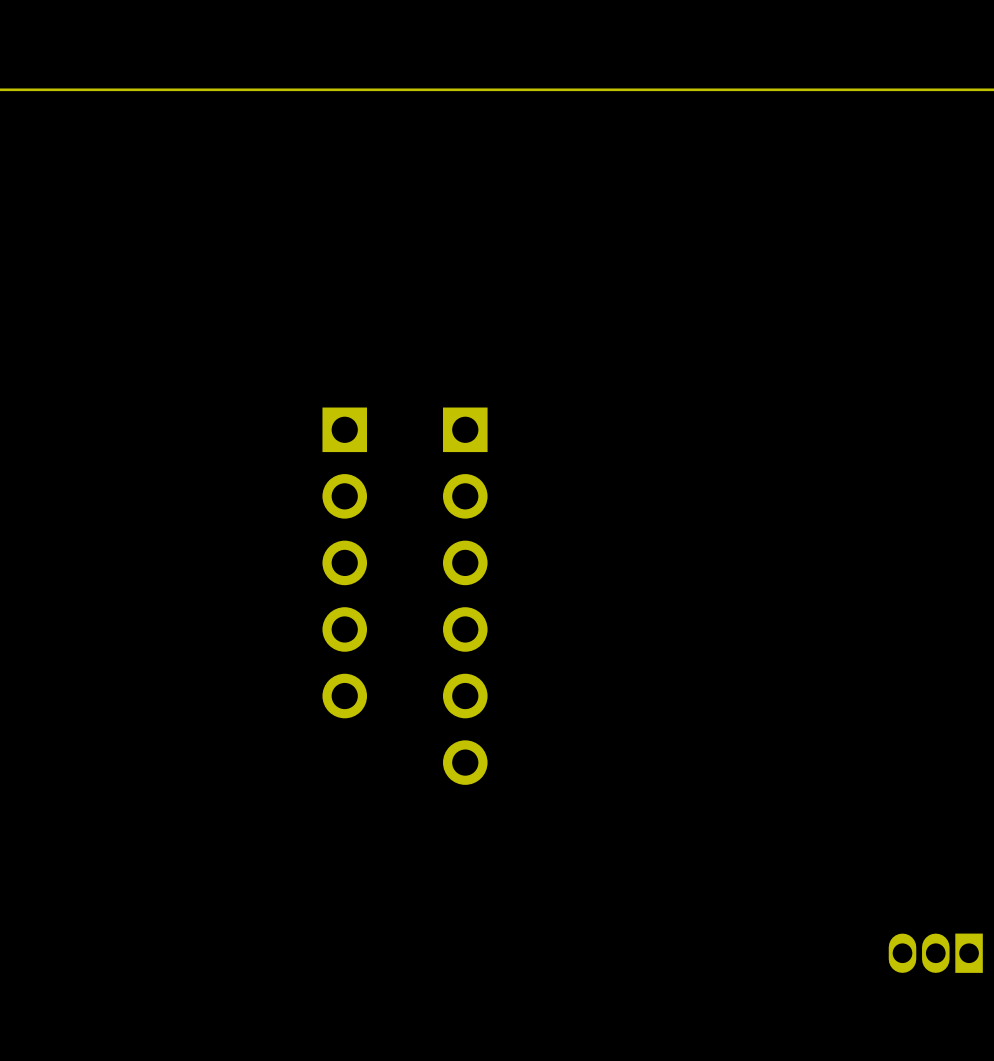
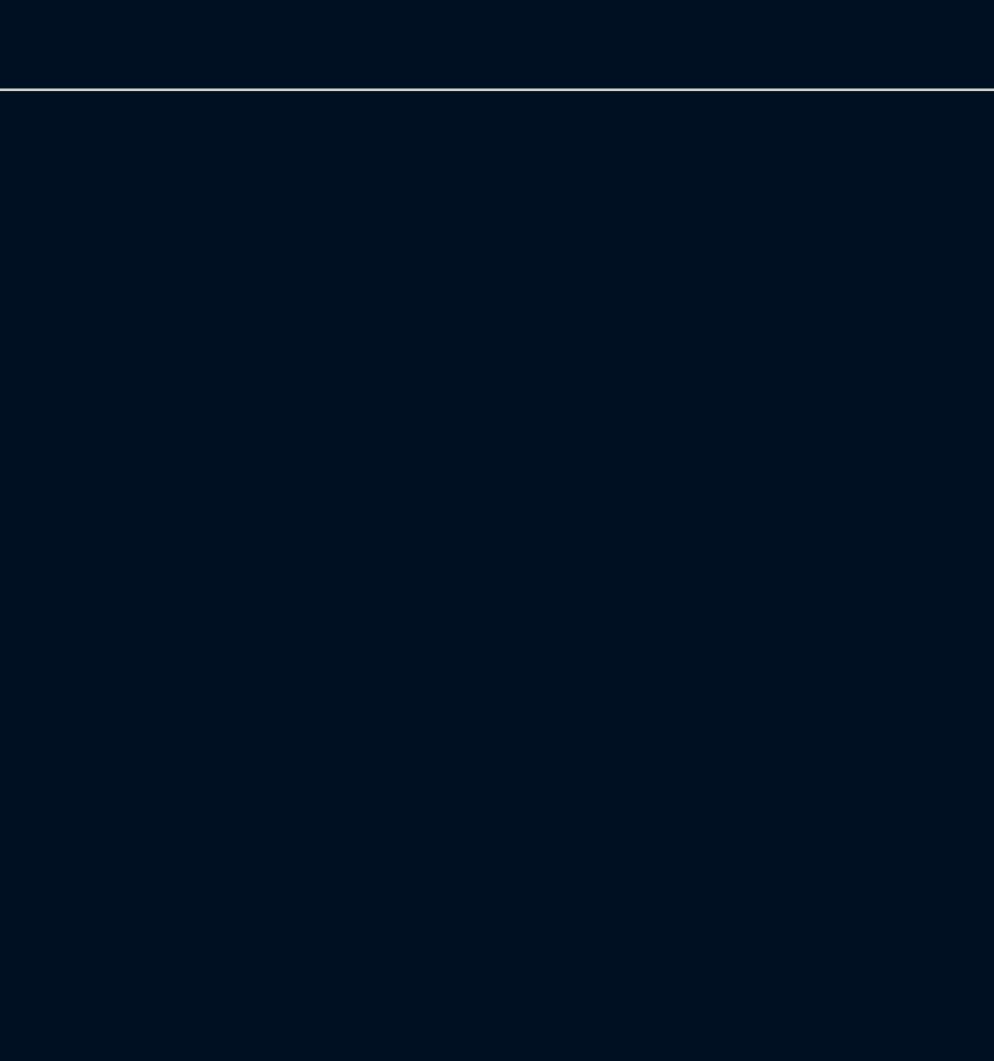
part: (344, 562) -> none
part: (465, 596) -> none
part: (935, 953) -> none

